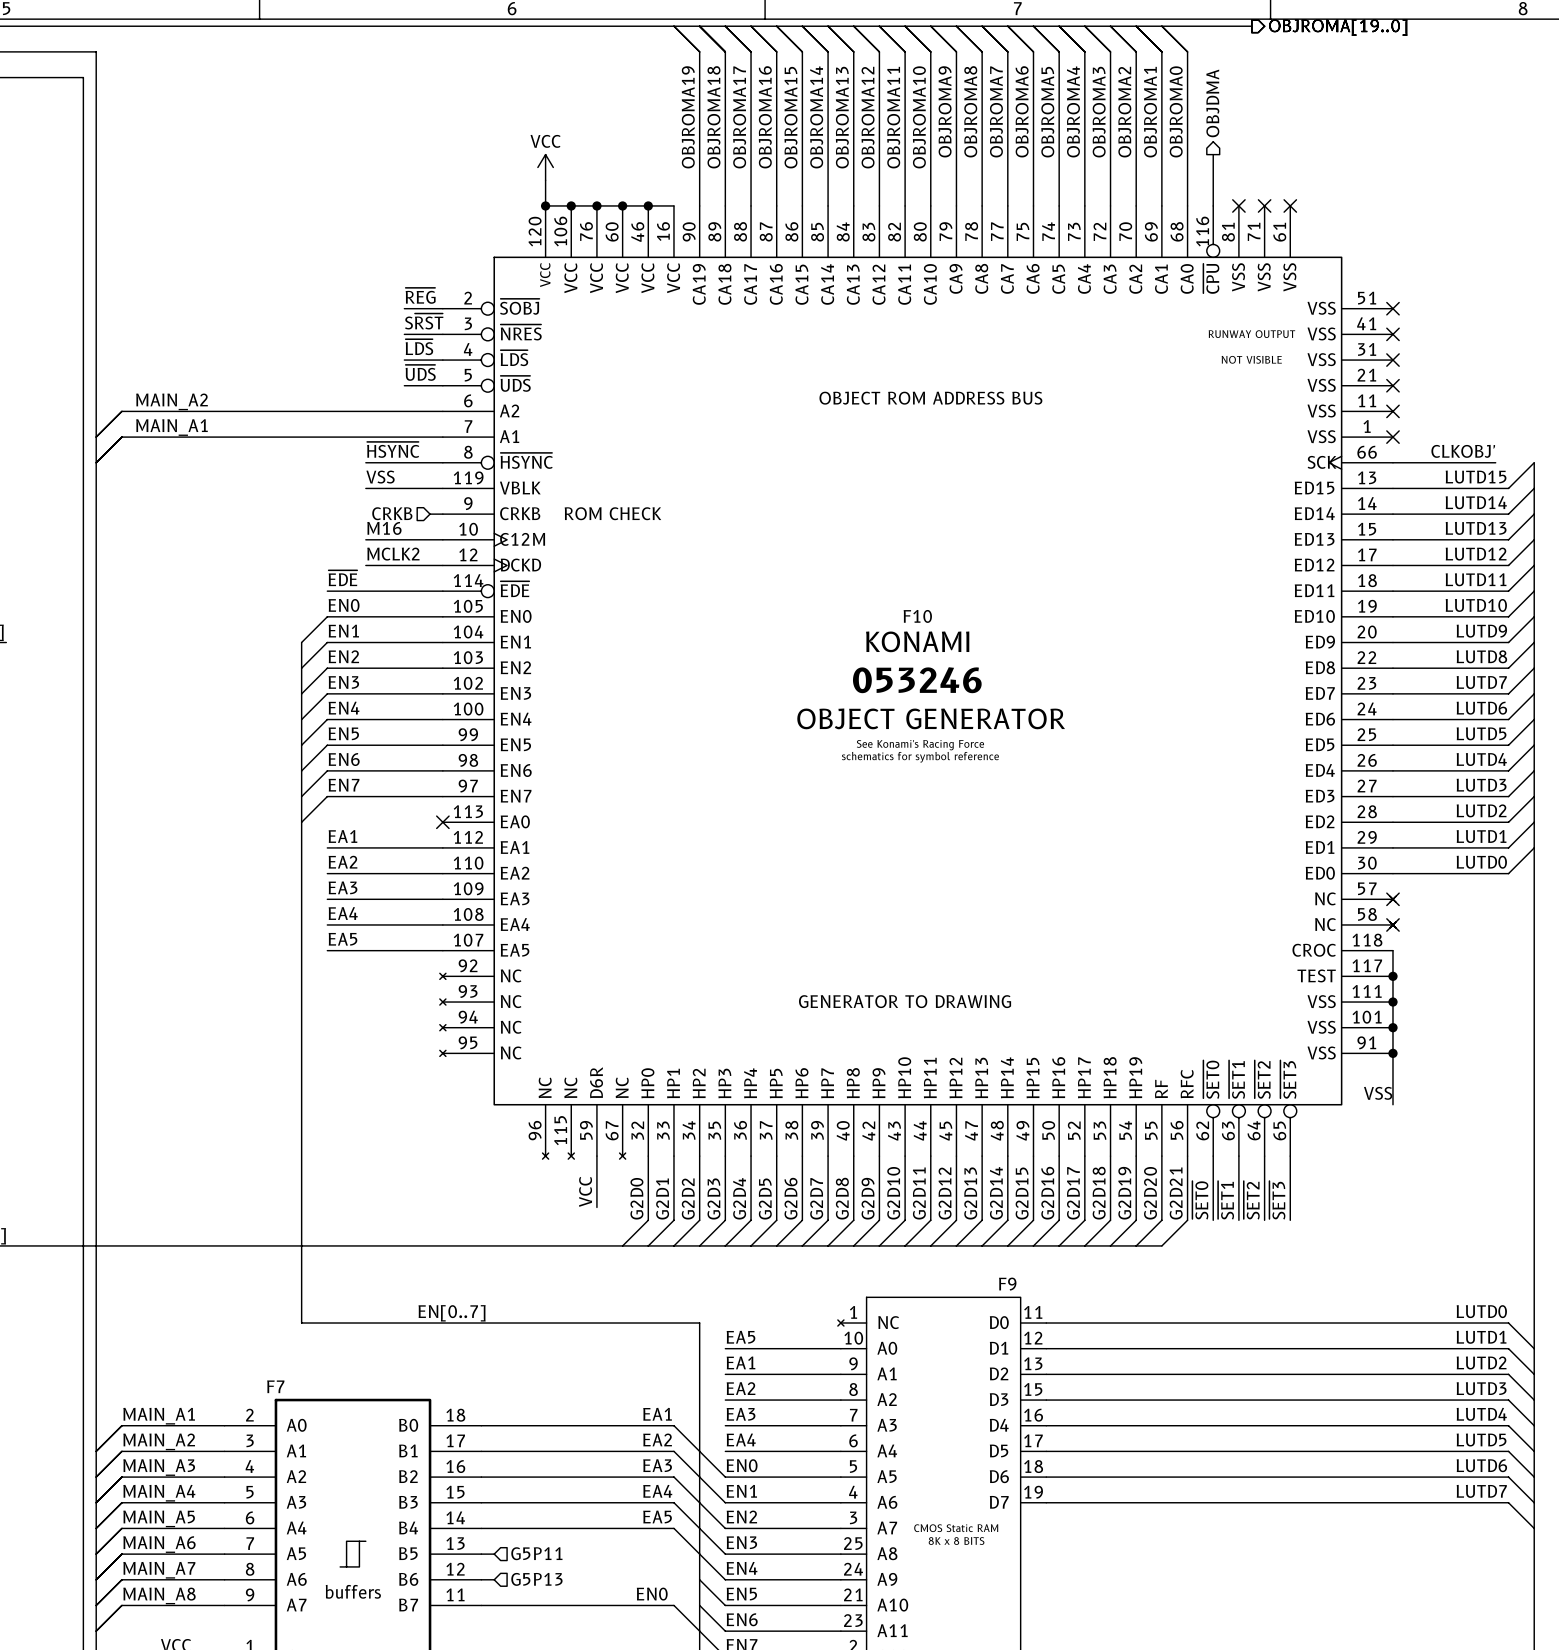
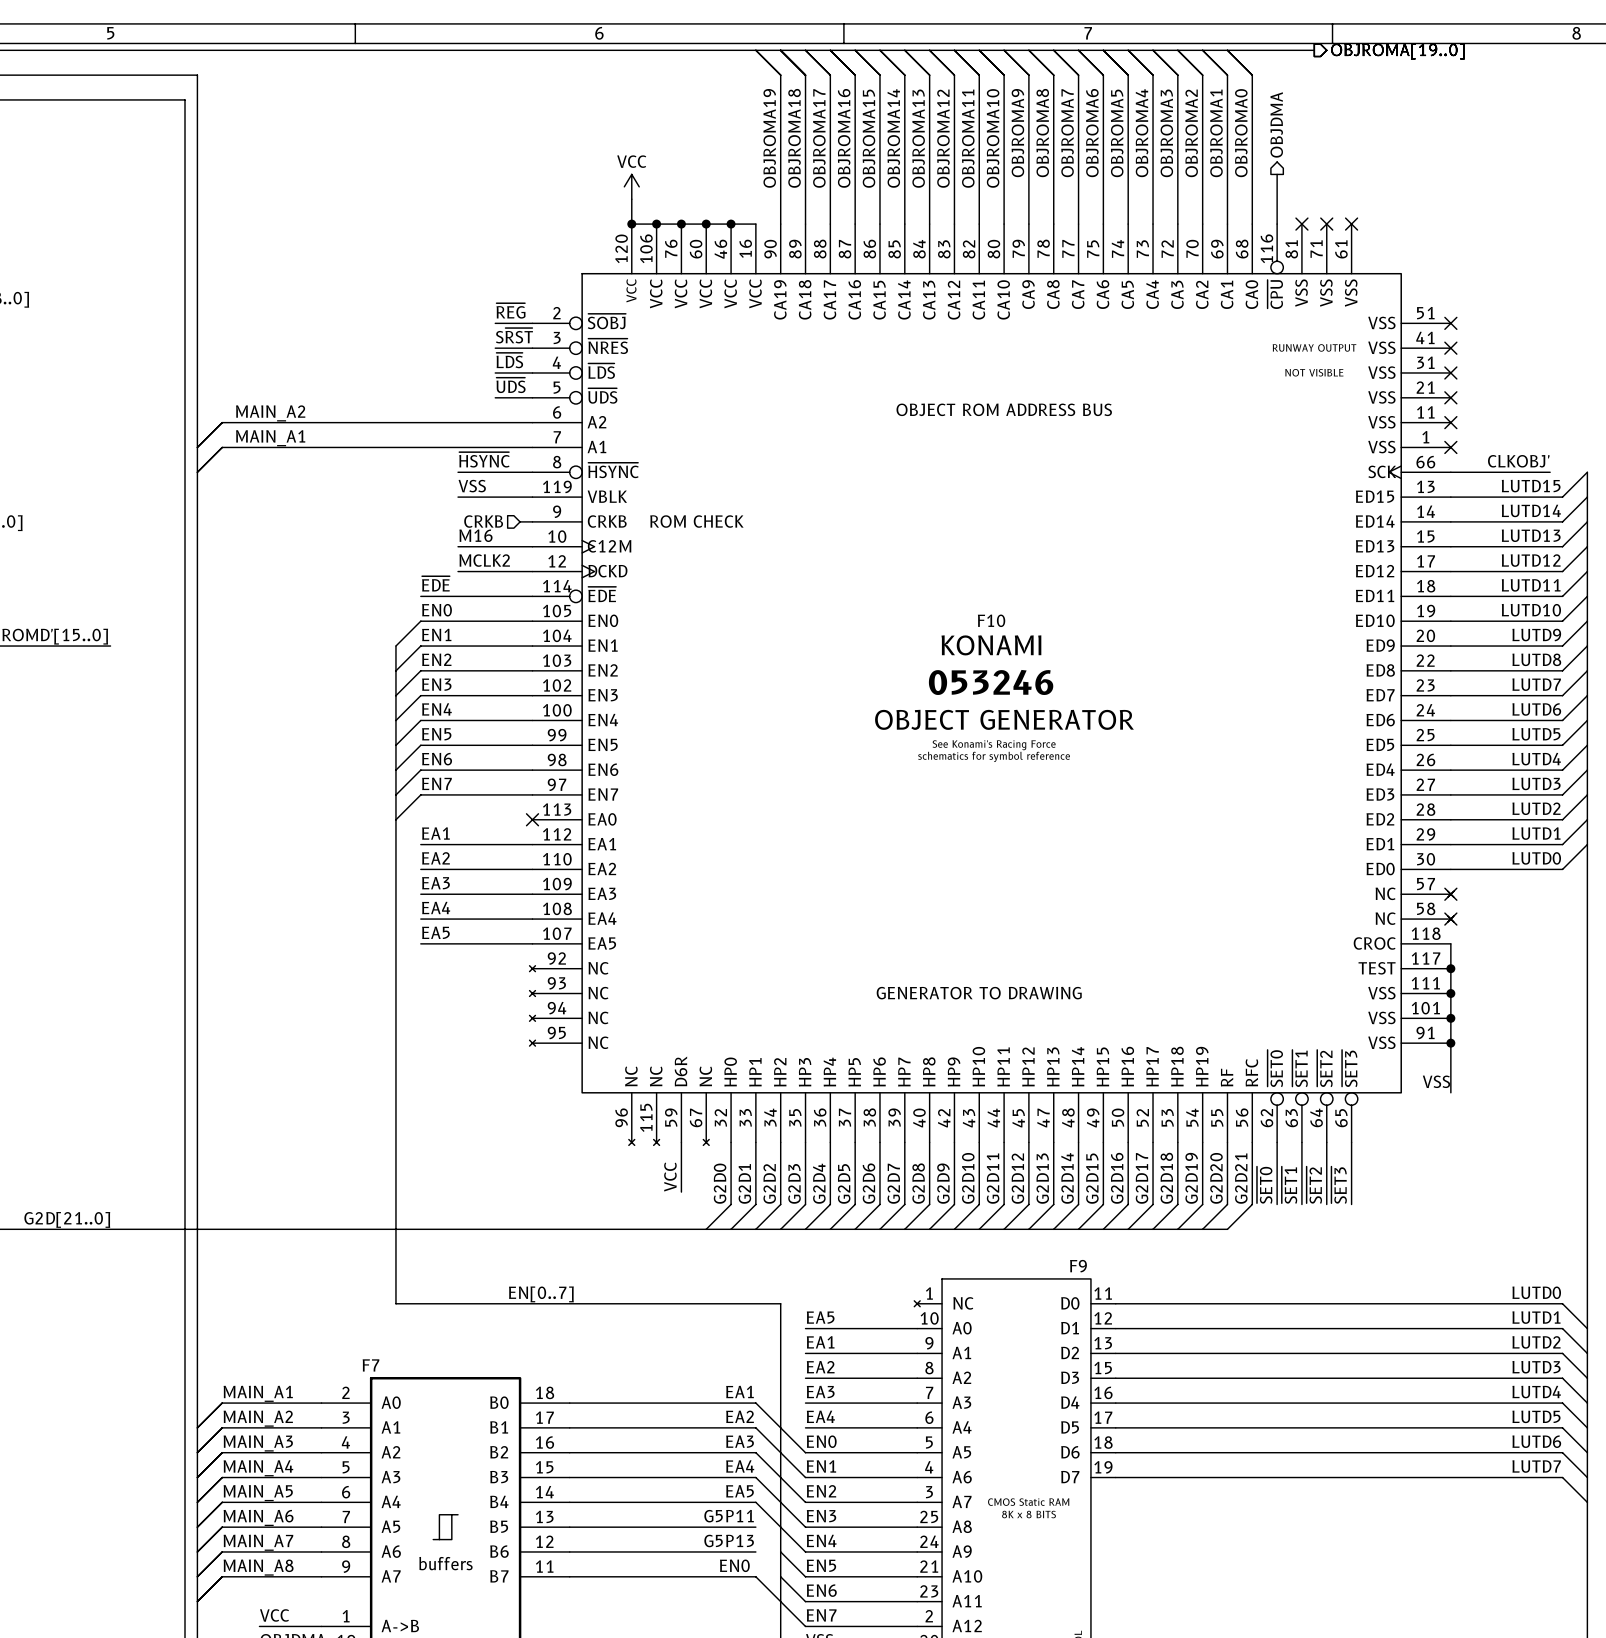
label: none -> G5P11 (729, 1516)
hierarchical label: G5P11 (536, 1553) -> none
wire: none -> (582, 1527) (755, 1527)
label: none -> G5P13 (729, 1540)
wire: none -> (582, 1551) (755, 1551)
hierarchical label: G5P13 (536, 1579) -> none

